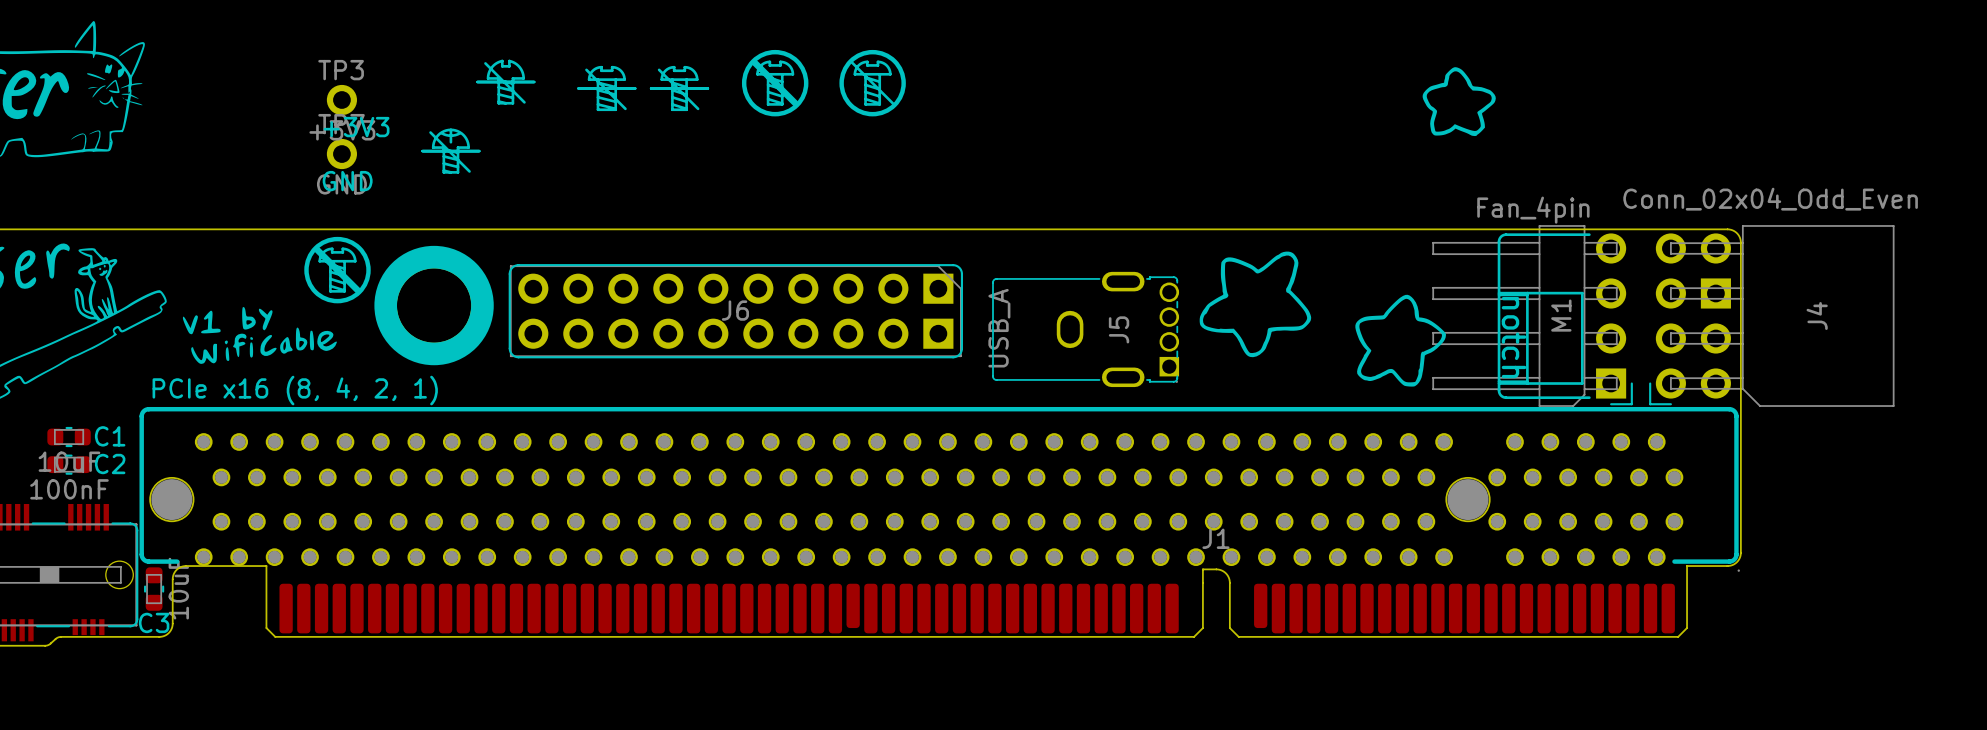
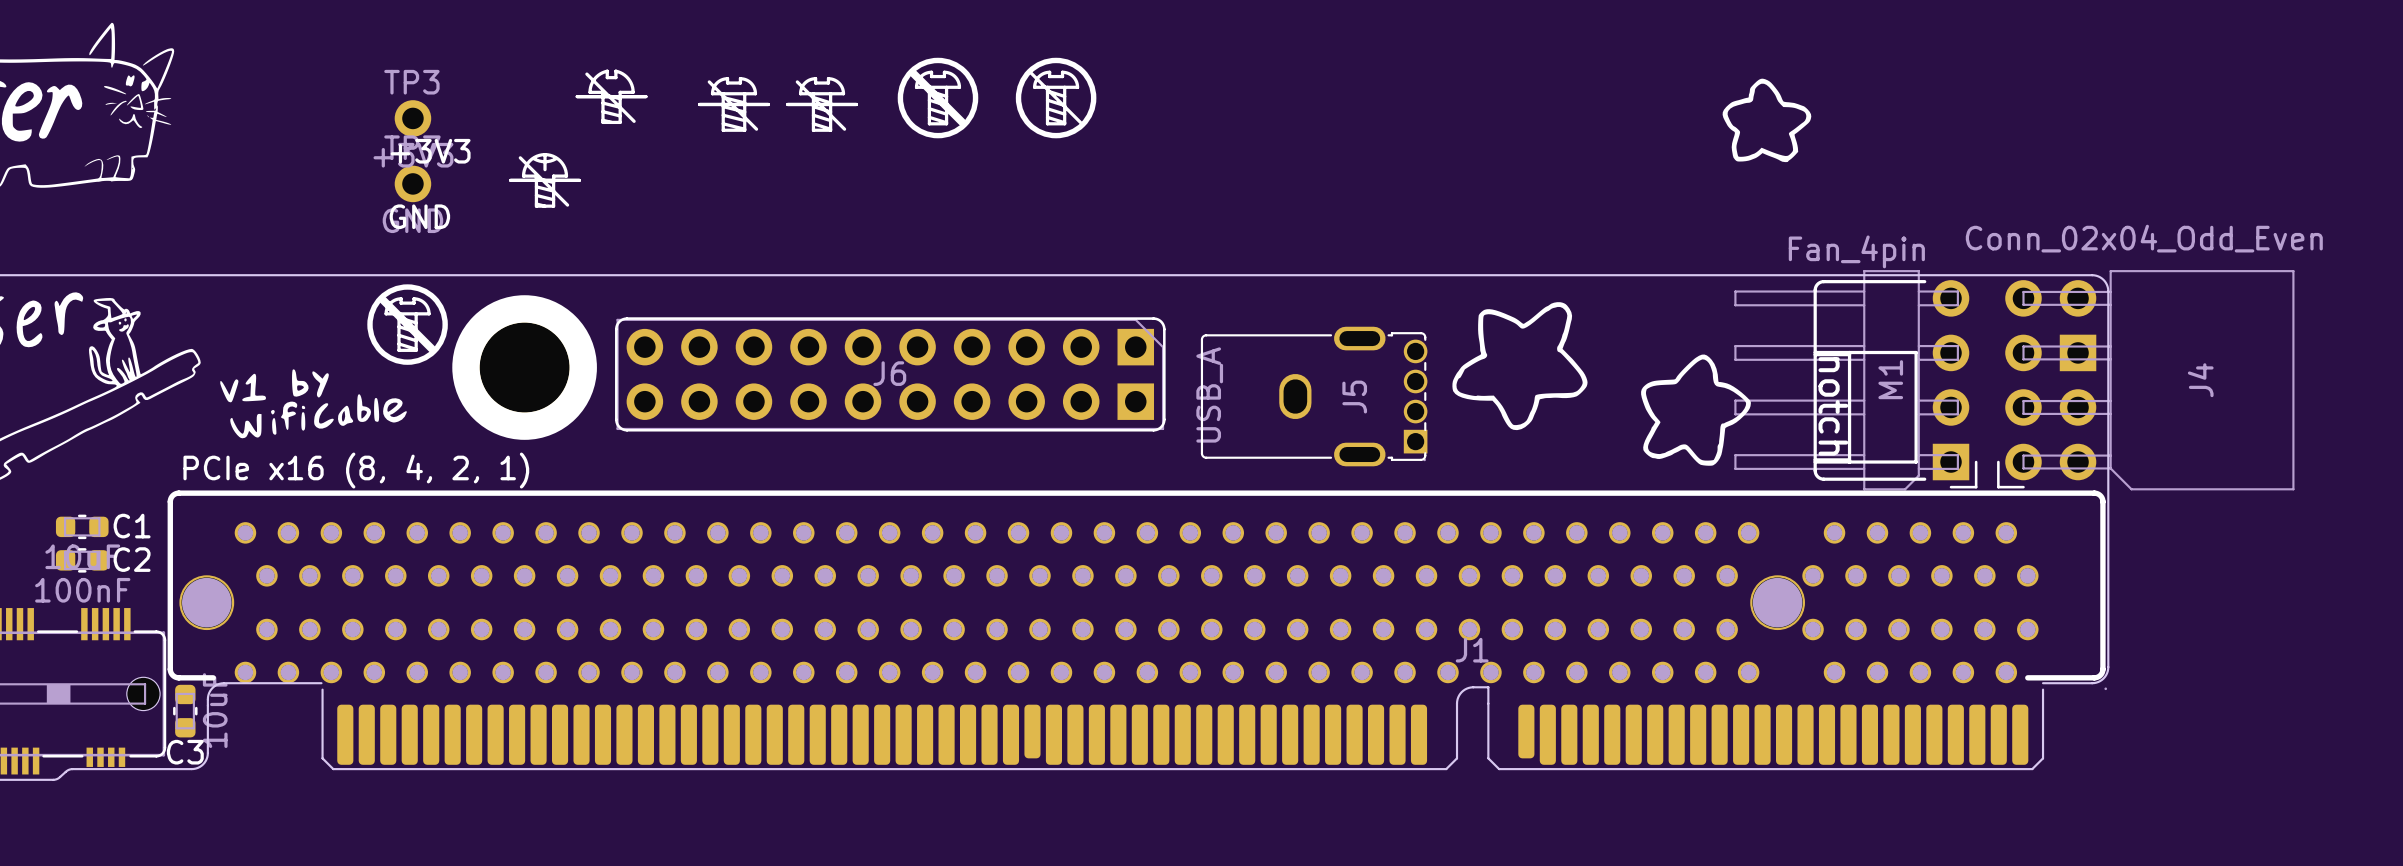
J1 footprint: [265, 565, 1688, 638] -> [321, 686, 2045, 771]

